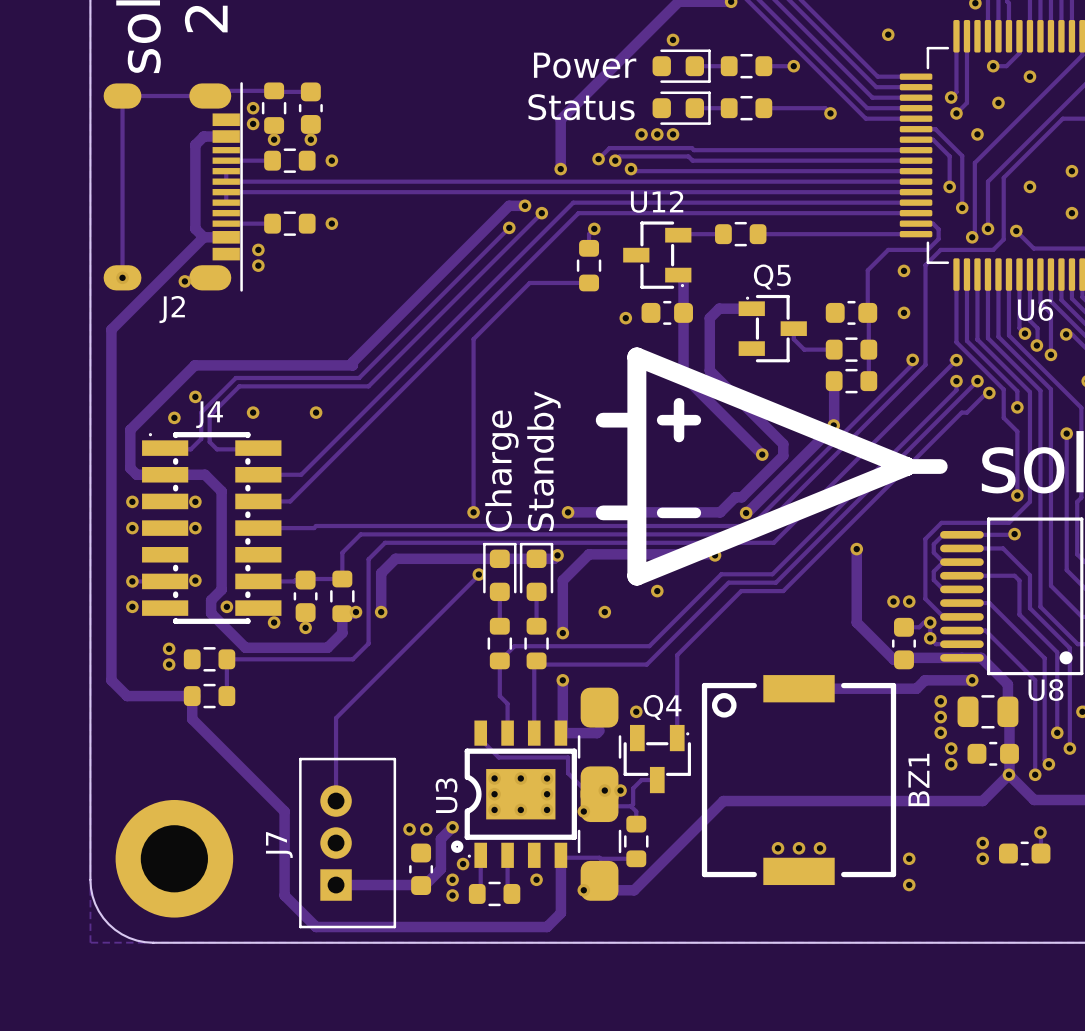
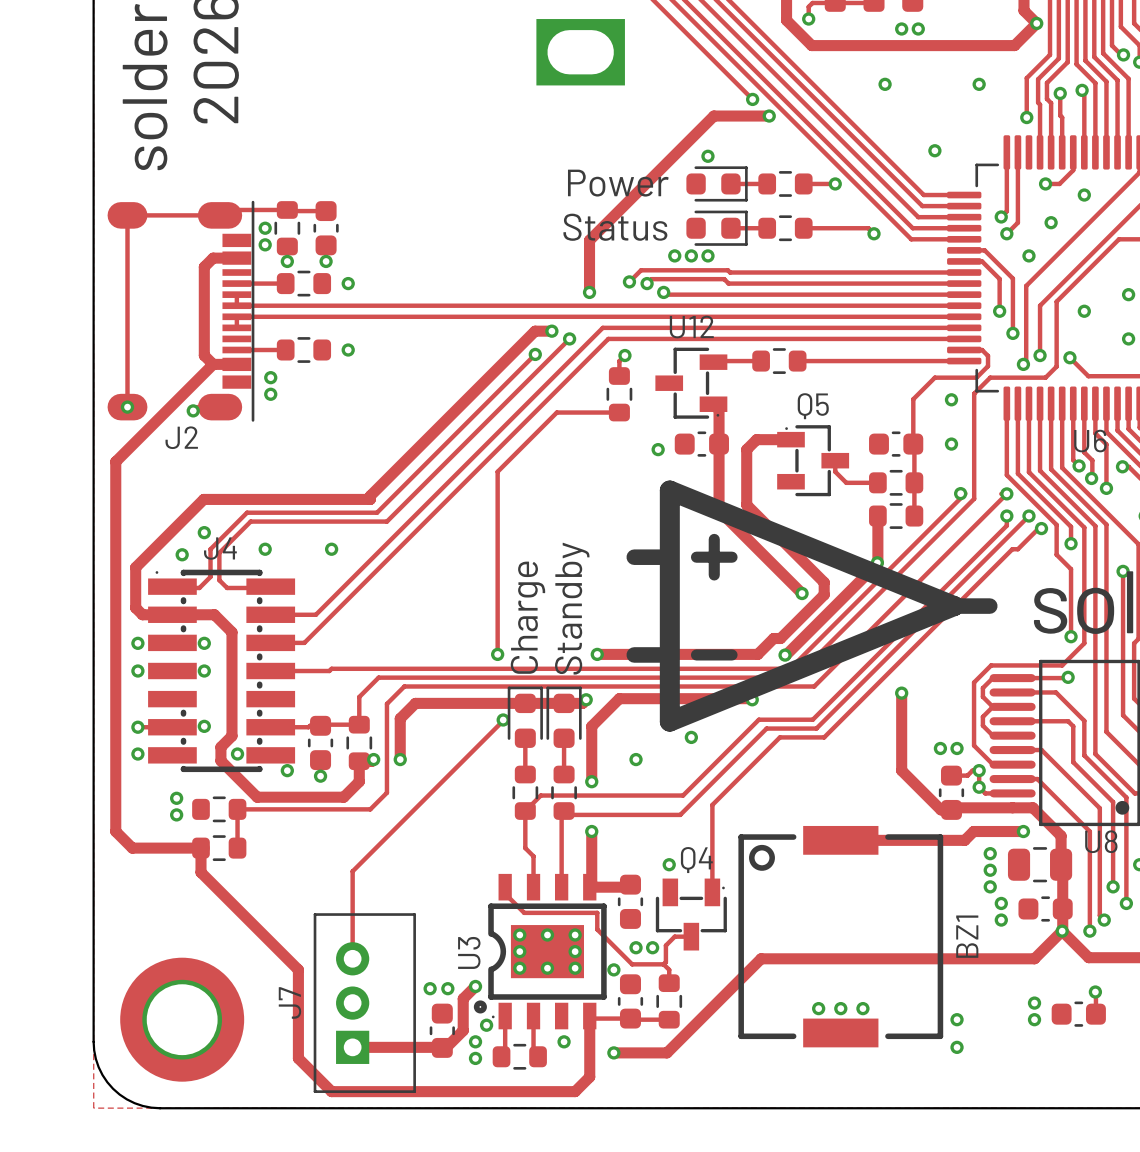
part footprint: [577, 687, 622, 807] -> [617, 874, 644, 929]
part footprint: [577, 782, 622, 901] -> [617, 974, 644, 1029]

